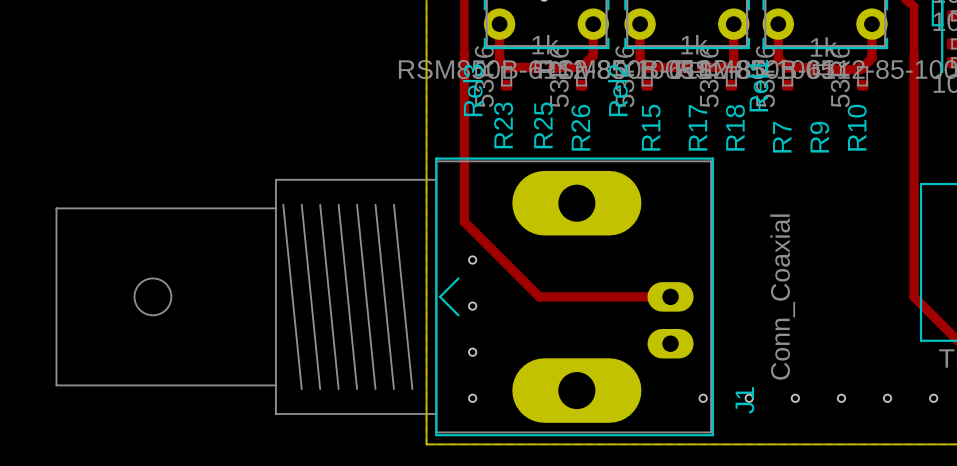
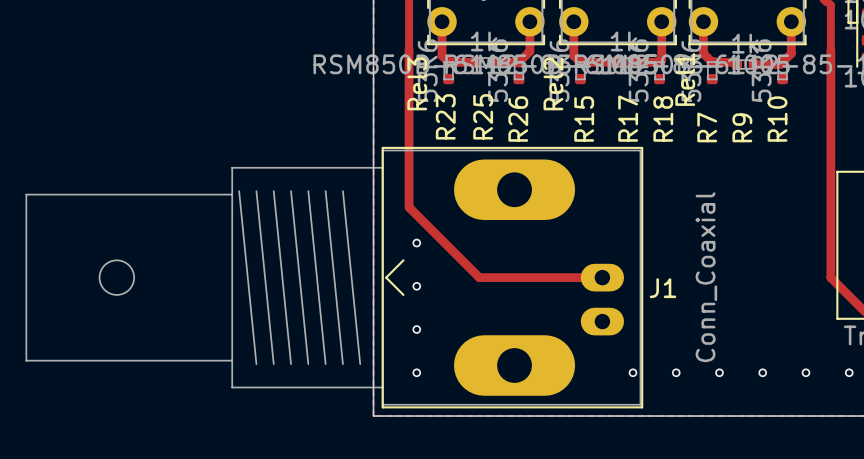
J1 name rotation: 0° (744, 400) -> 90° clockwise (663, 288)
J1 name position: J1 (744, 400) -> J1 (663, 288)

